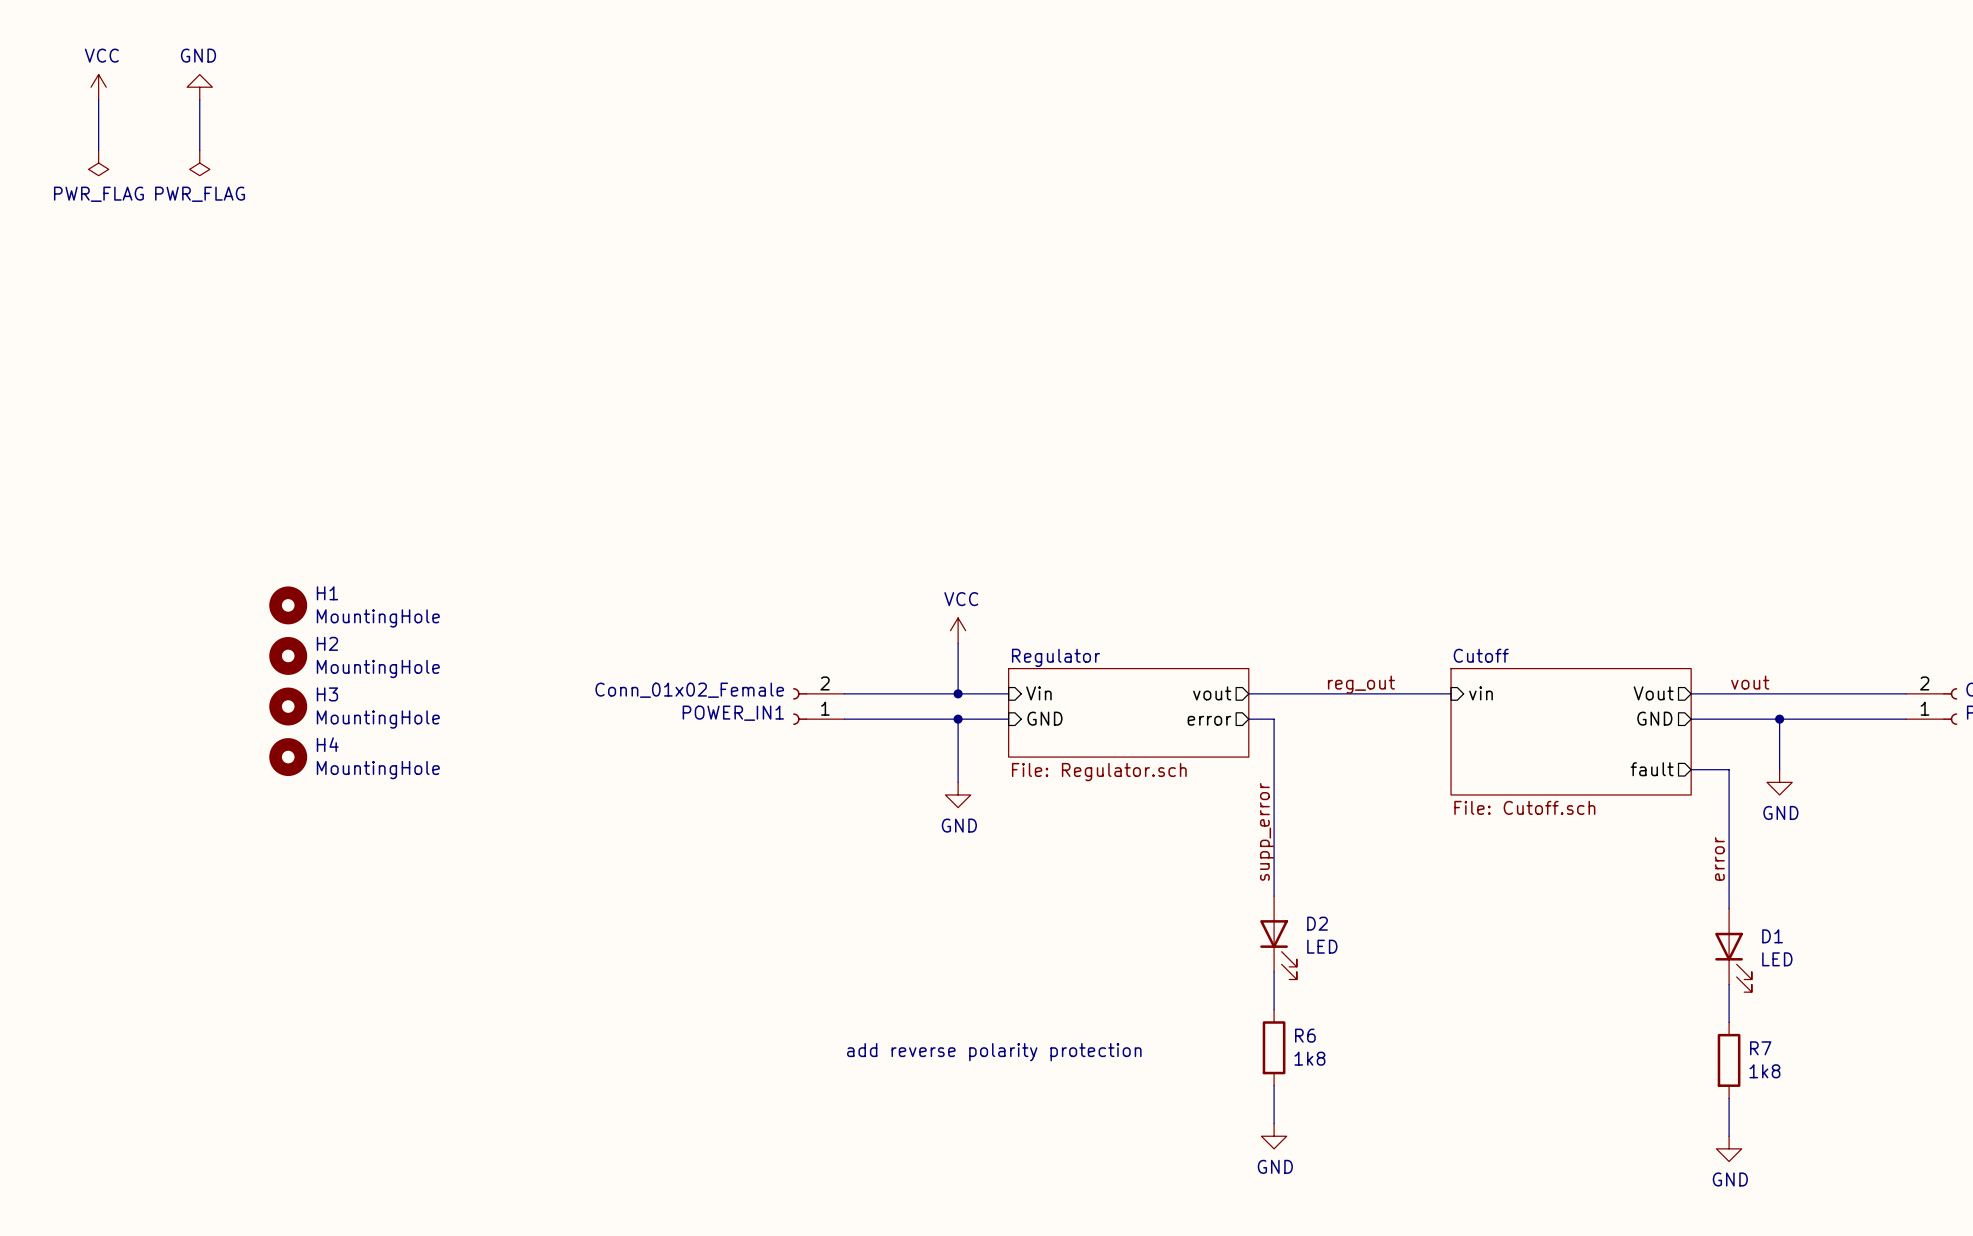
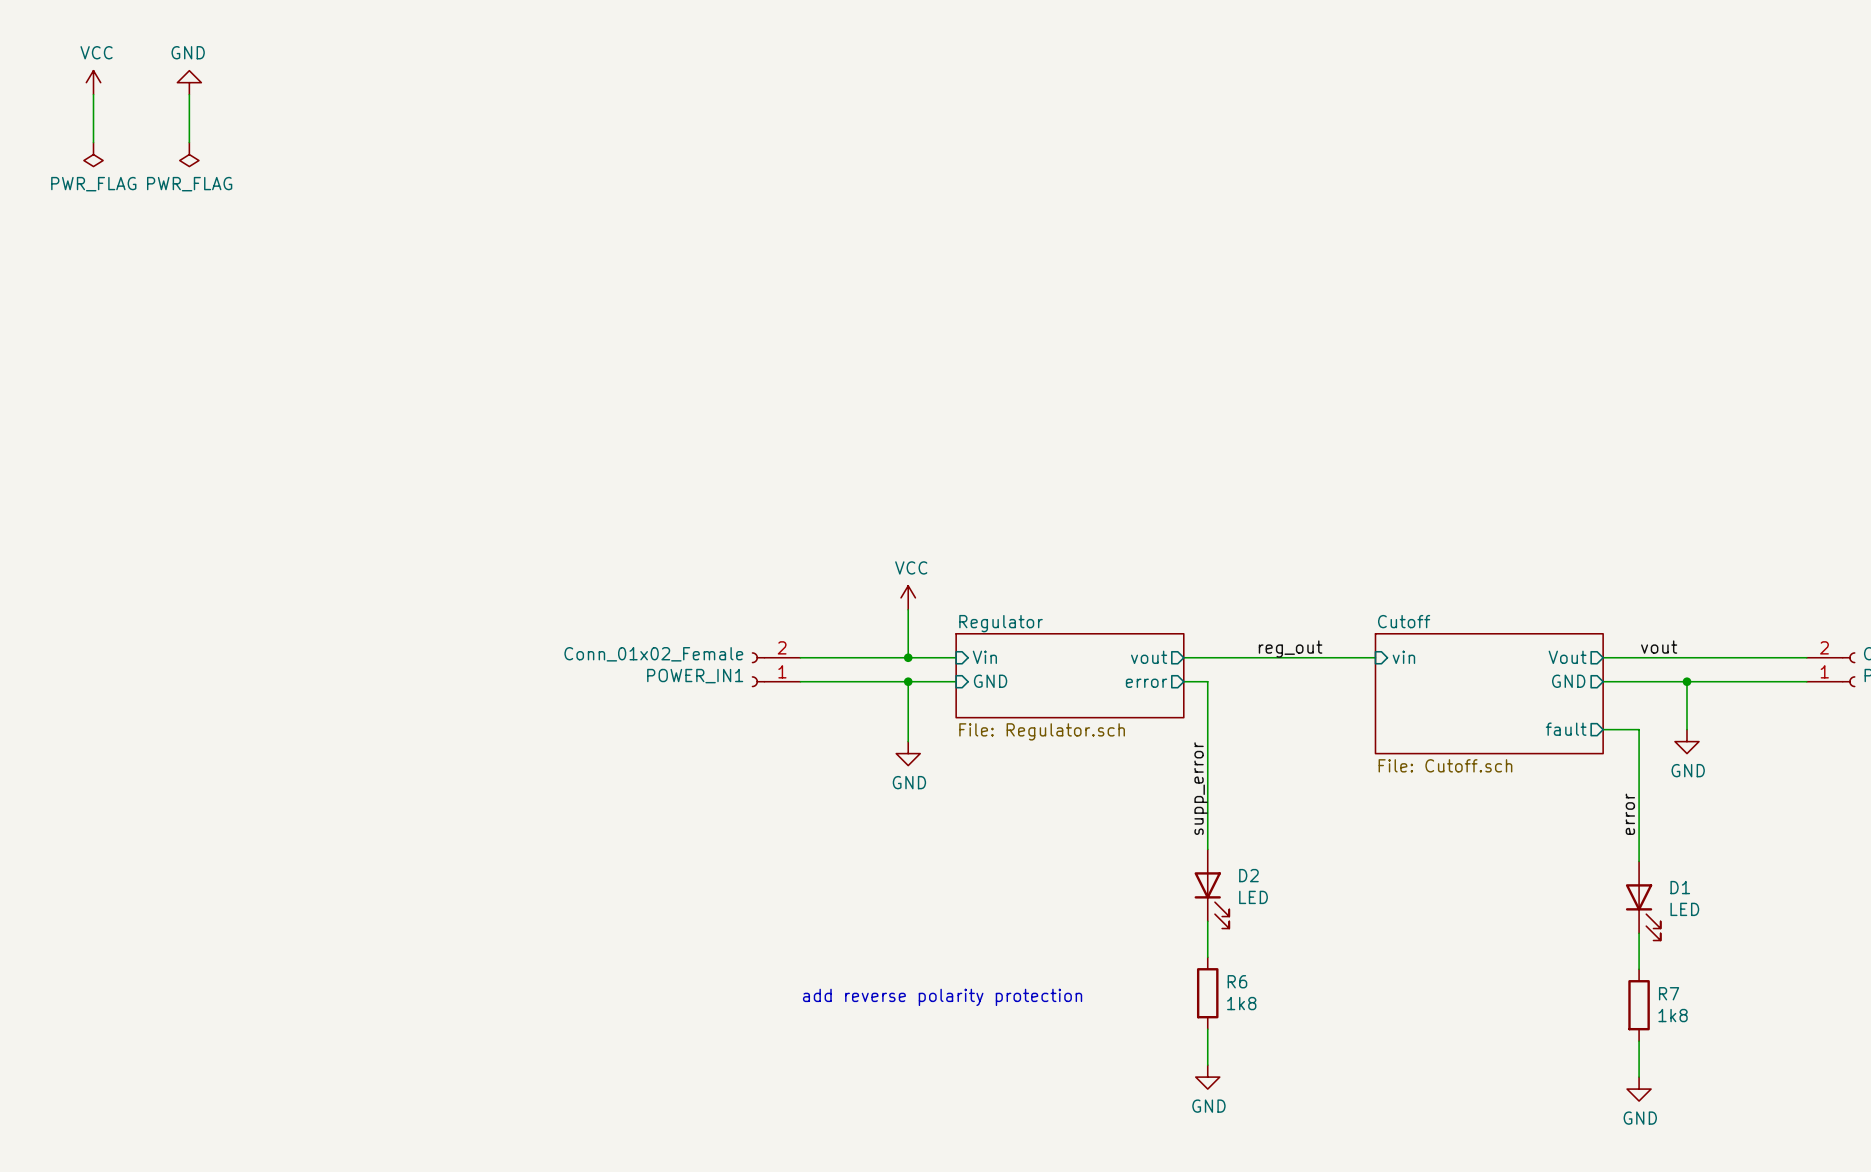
H1: MountingHole (288, 605) -> none
H2: MountingHole (288, 655) -> none
H3: MountingHole (288, 706) -> none
H4: MountingHole (288, 757) -> none

